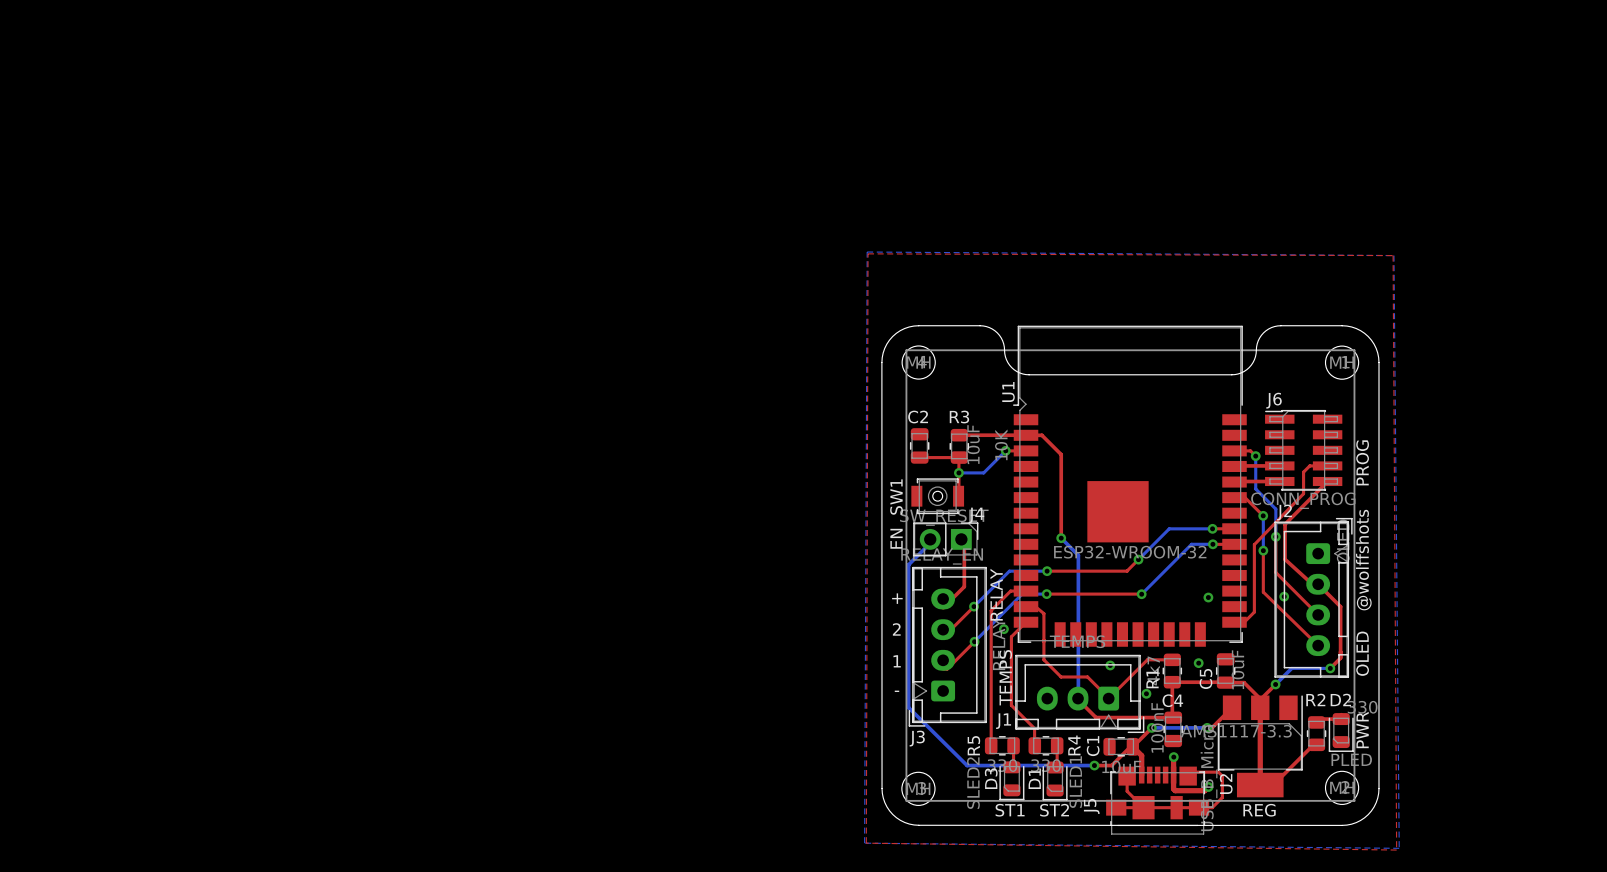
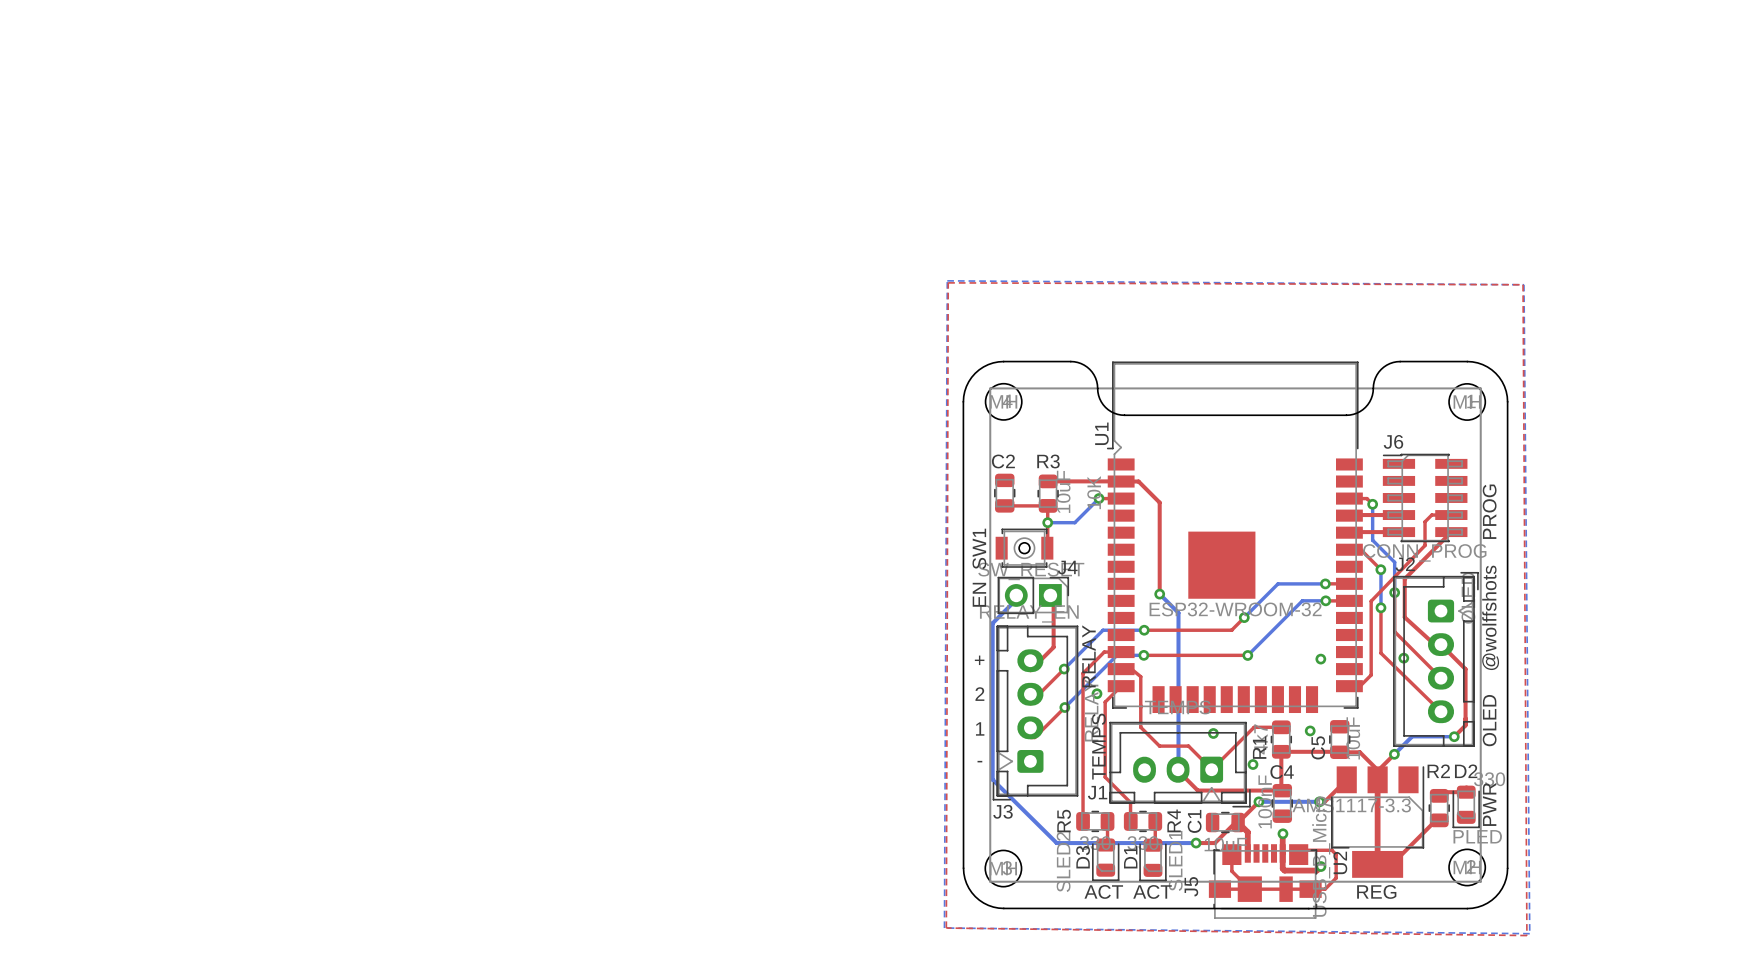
D3 text: ST1 (1010, 810) -> ACT (1103, 891)
D1 text: ST2 (1054, 810) -> ACT (1152, 891)

